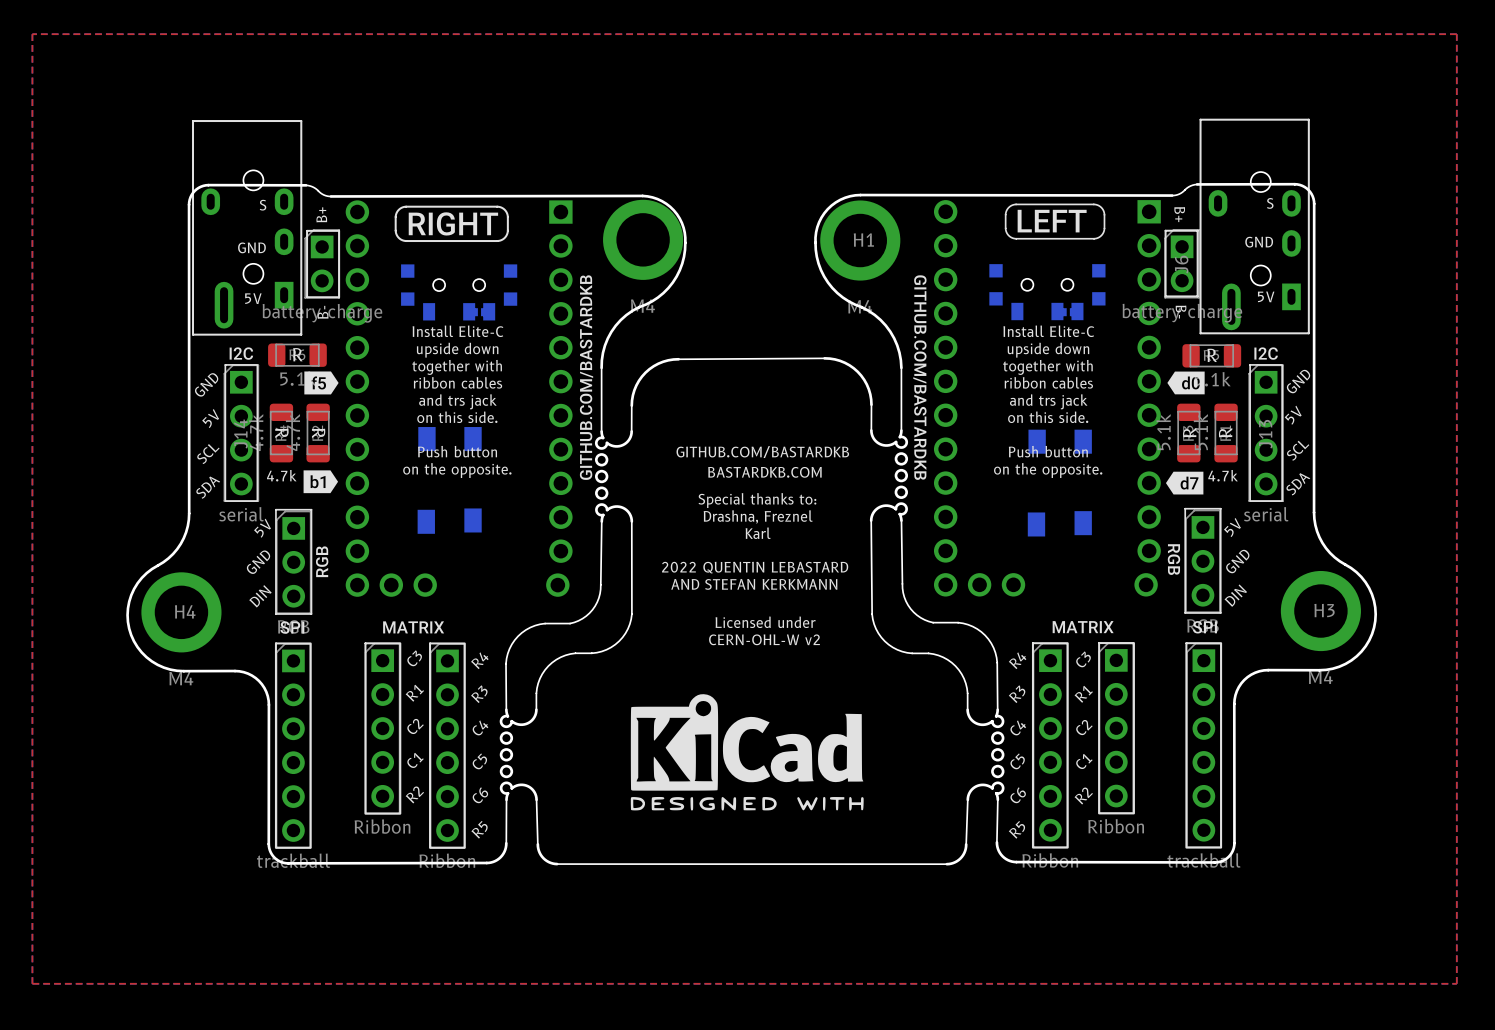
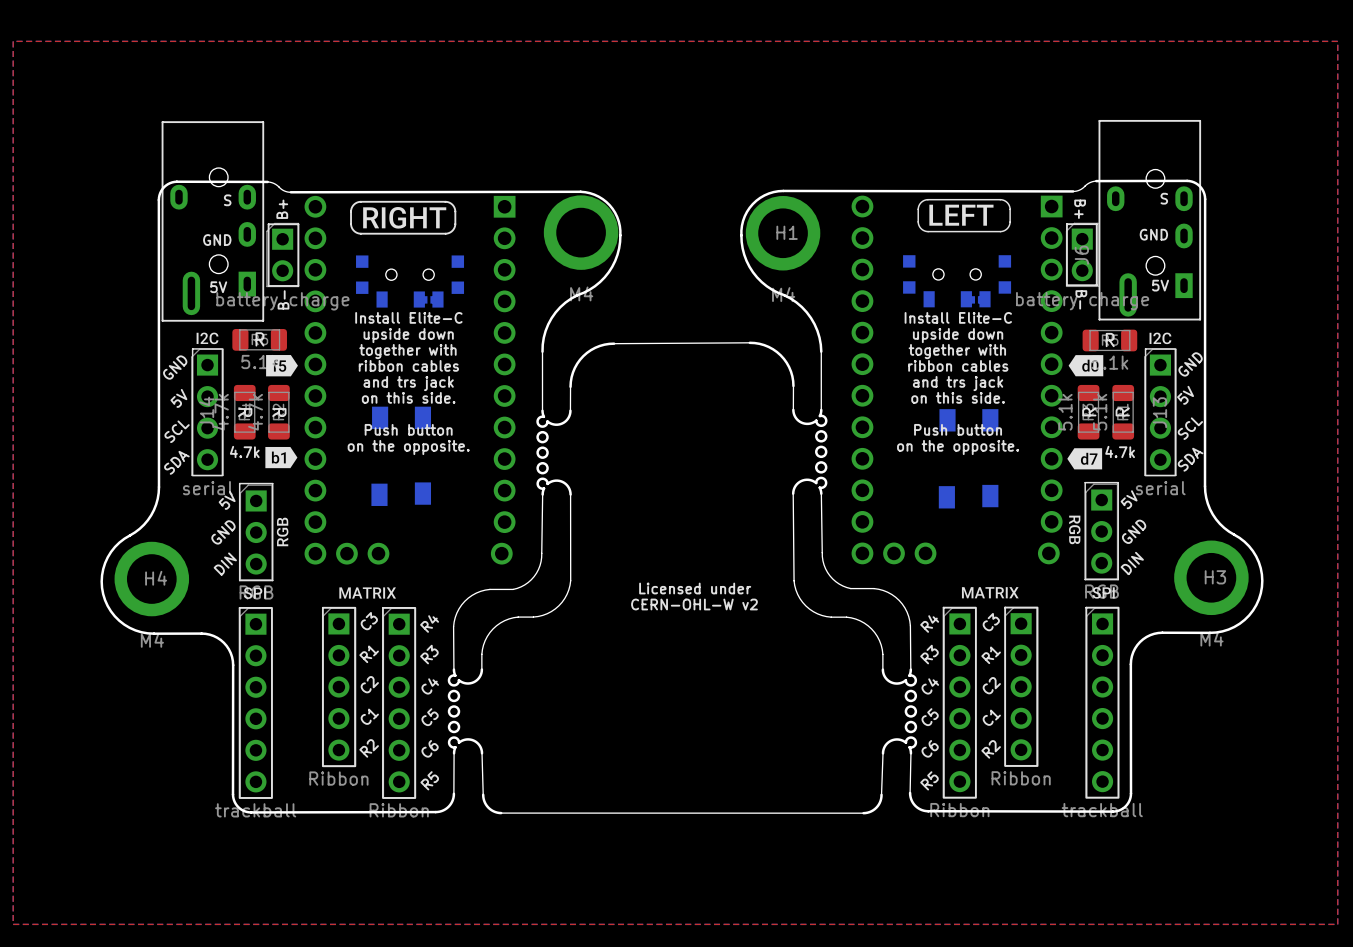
drawing: [579, 275, 594, 480] -> none
drawing: [913, 275, 927, 480] -> none
text: GITHUB.COM/BASTARDKB (762, 452) -> none
text: BASTARDKB.COM (764, 472) -> none
text: Special thanks to: (757, 500) -> none
text: Drashna, Freznel (758, 517) -> none
text: Karl (758, 533) -> none
text: 2022 QUENTIN LEBASTARD (755, 567) -> none
text: AND STEFAN KERKMANN (754, 584) -> none
drawing: [630, 694, 864, 811] -> none

